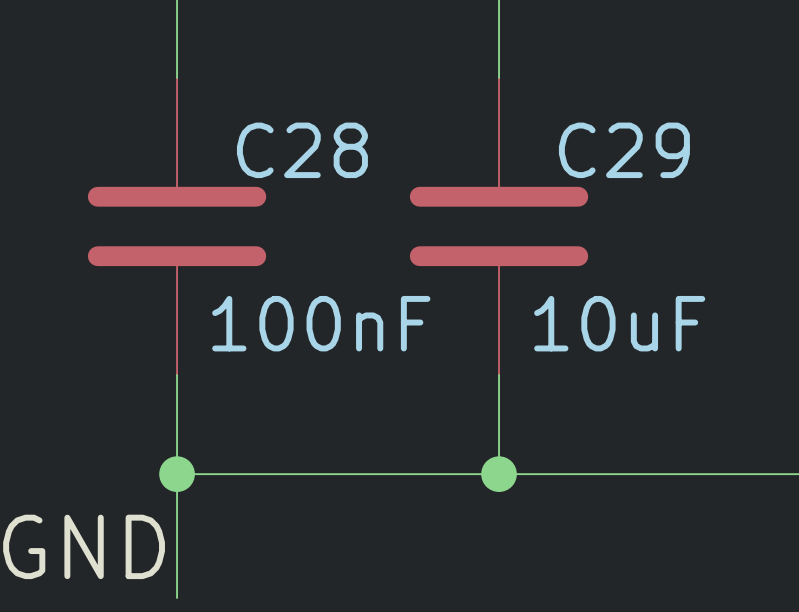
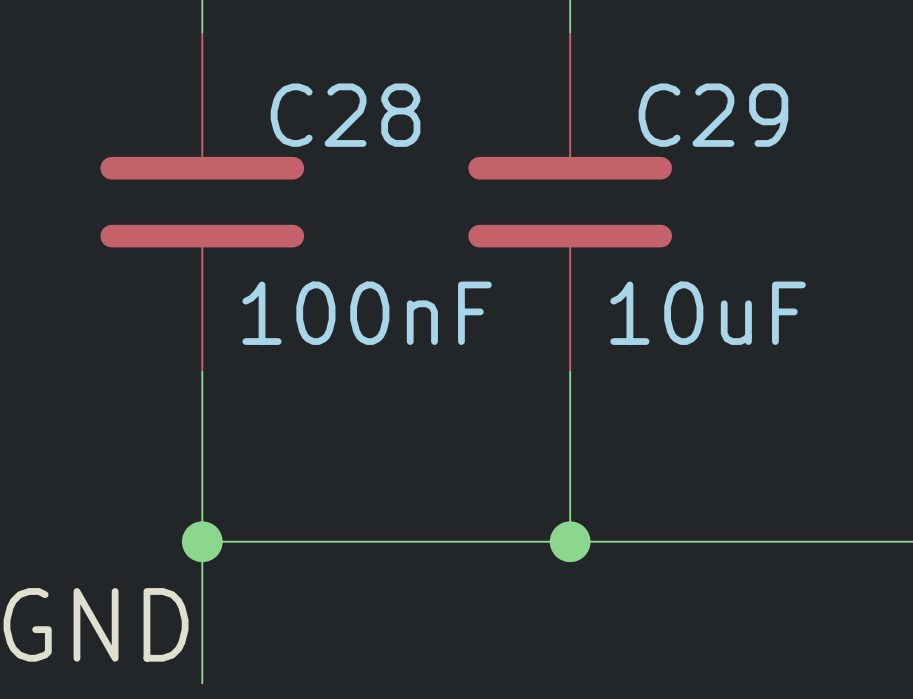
C28 position: (177, 226) -> (202, 202)
C29 position: (499, 226) -> (570, 202)

